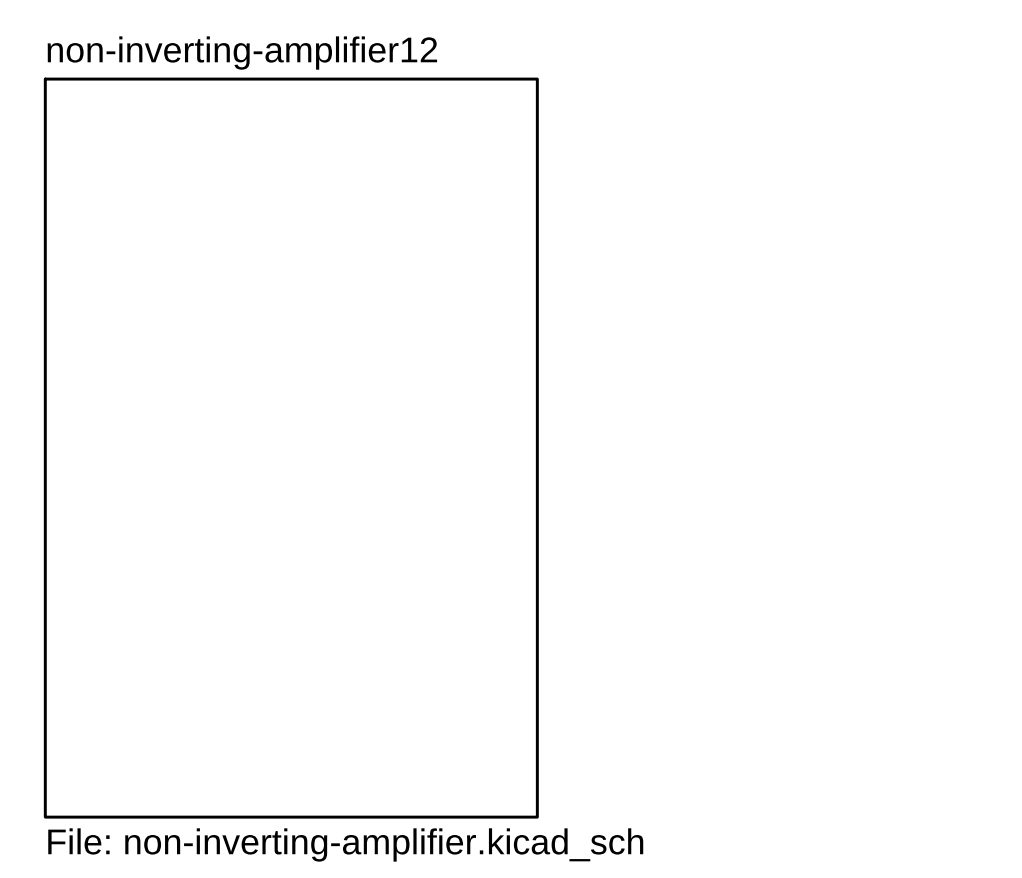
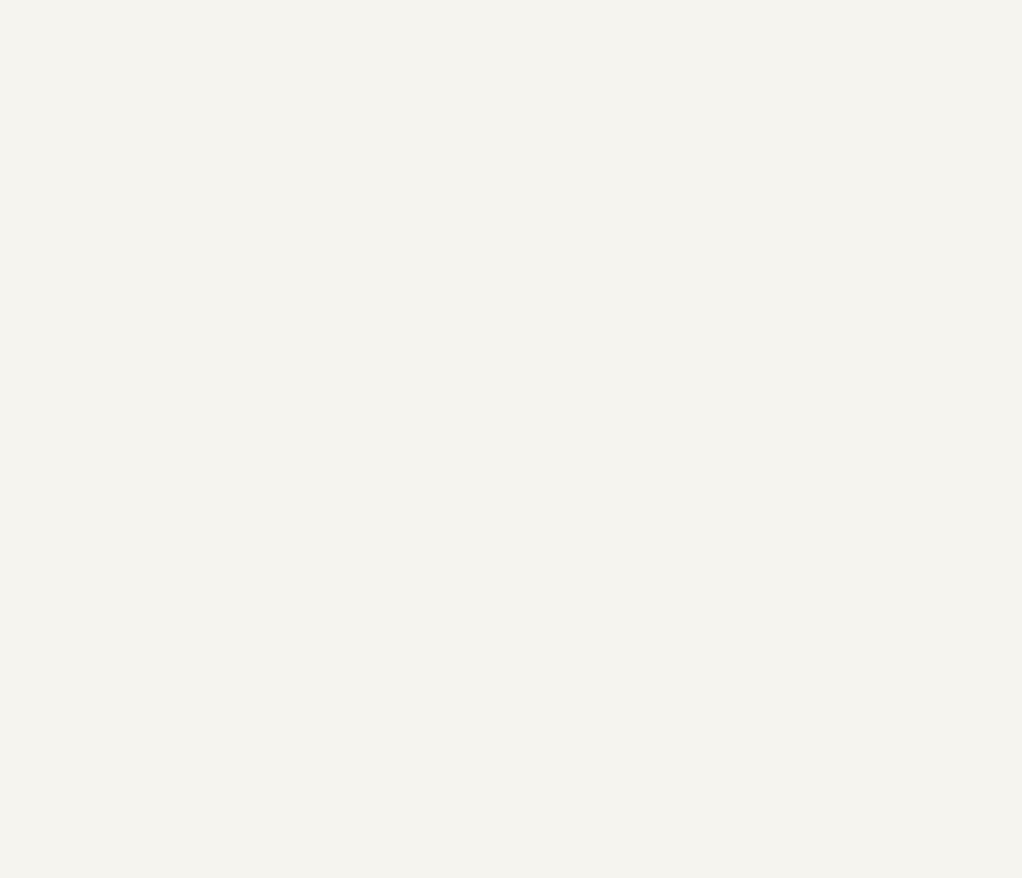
sheet non-inverting-amplifier12: File: non-inverting-amplifier.kicad_sch (291, 448) -> none

